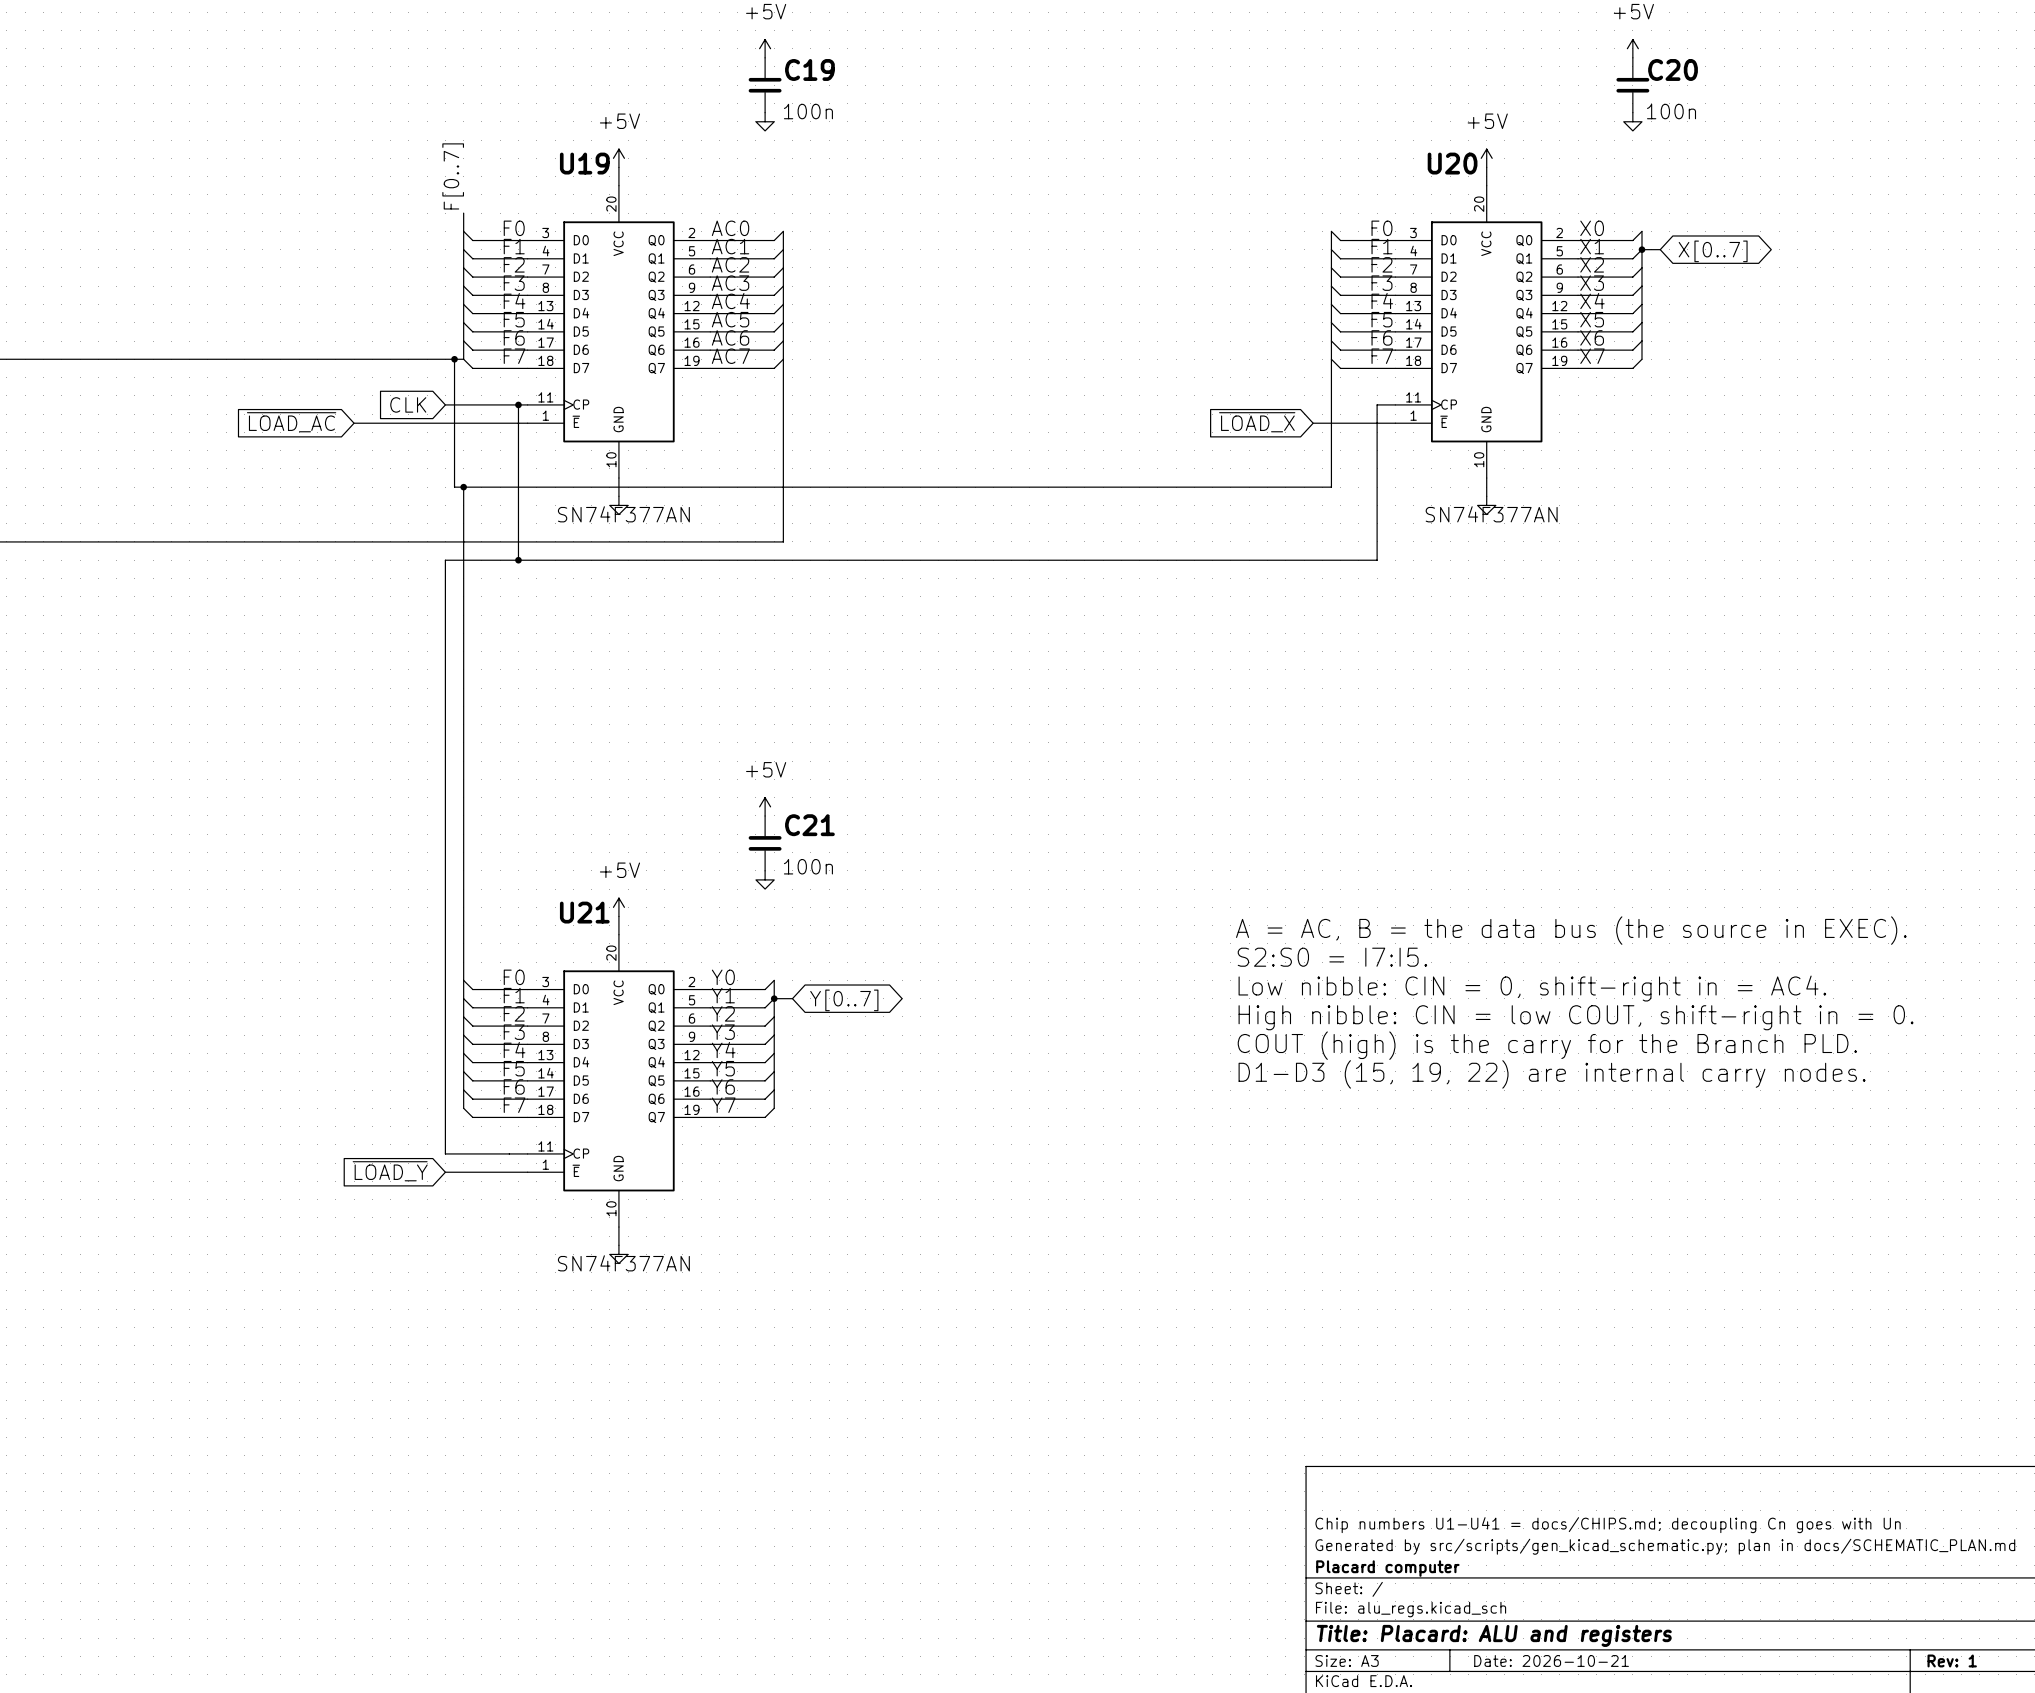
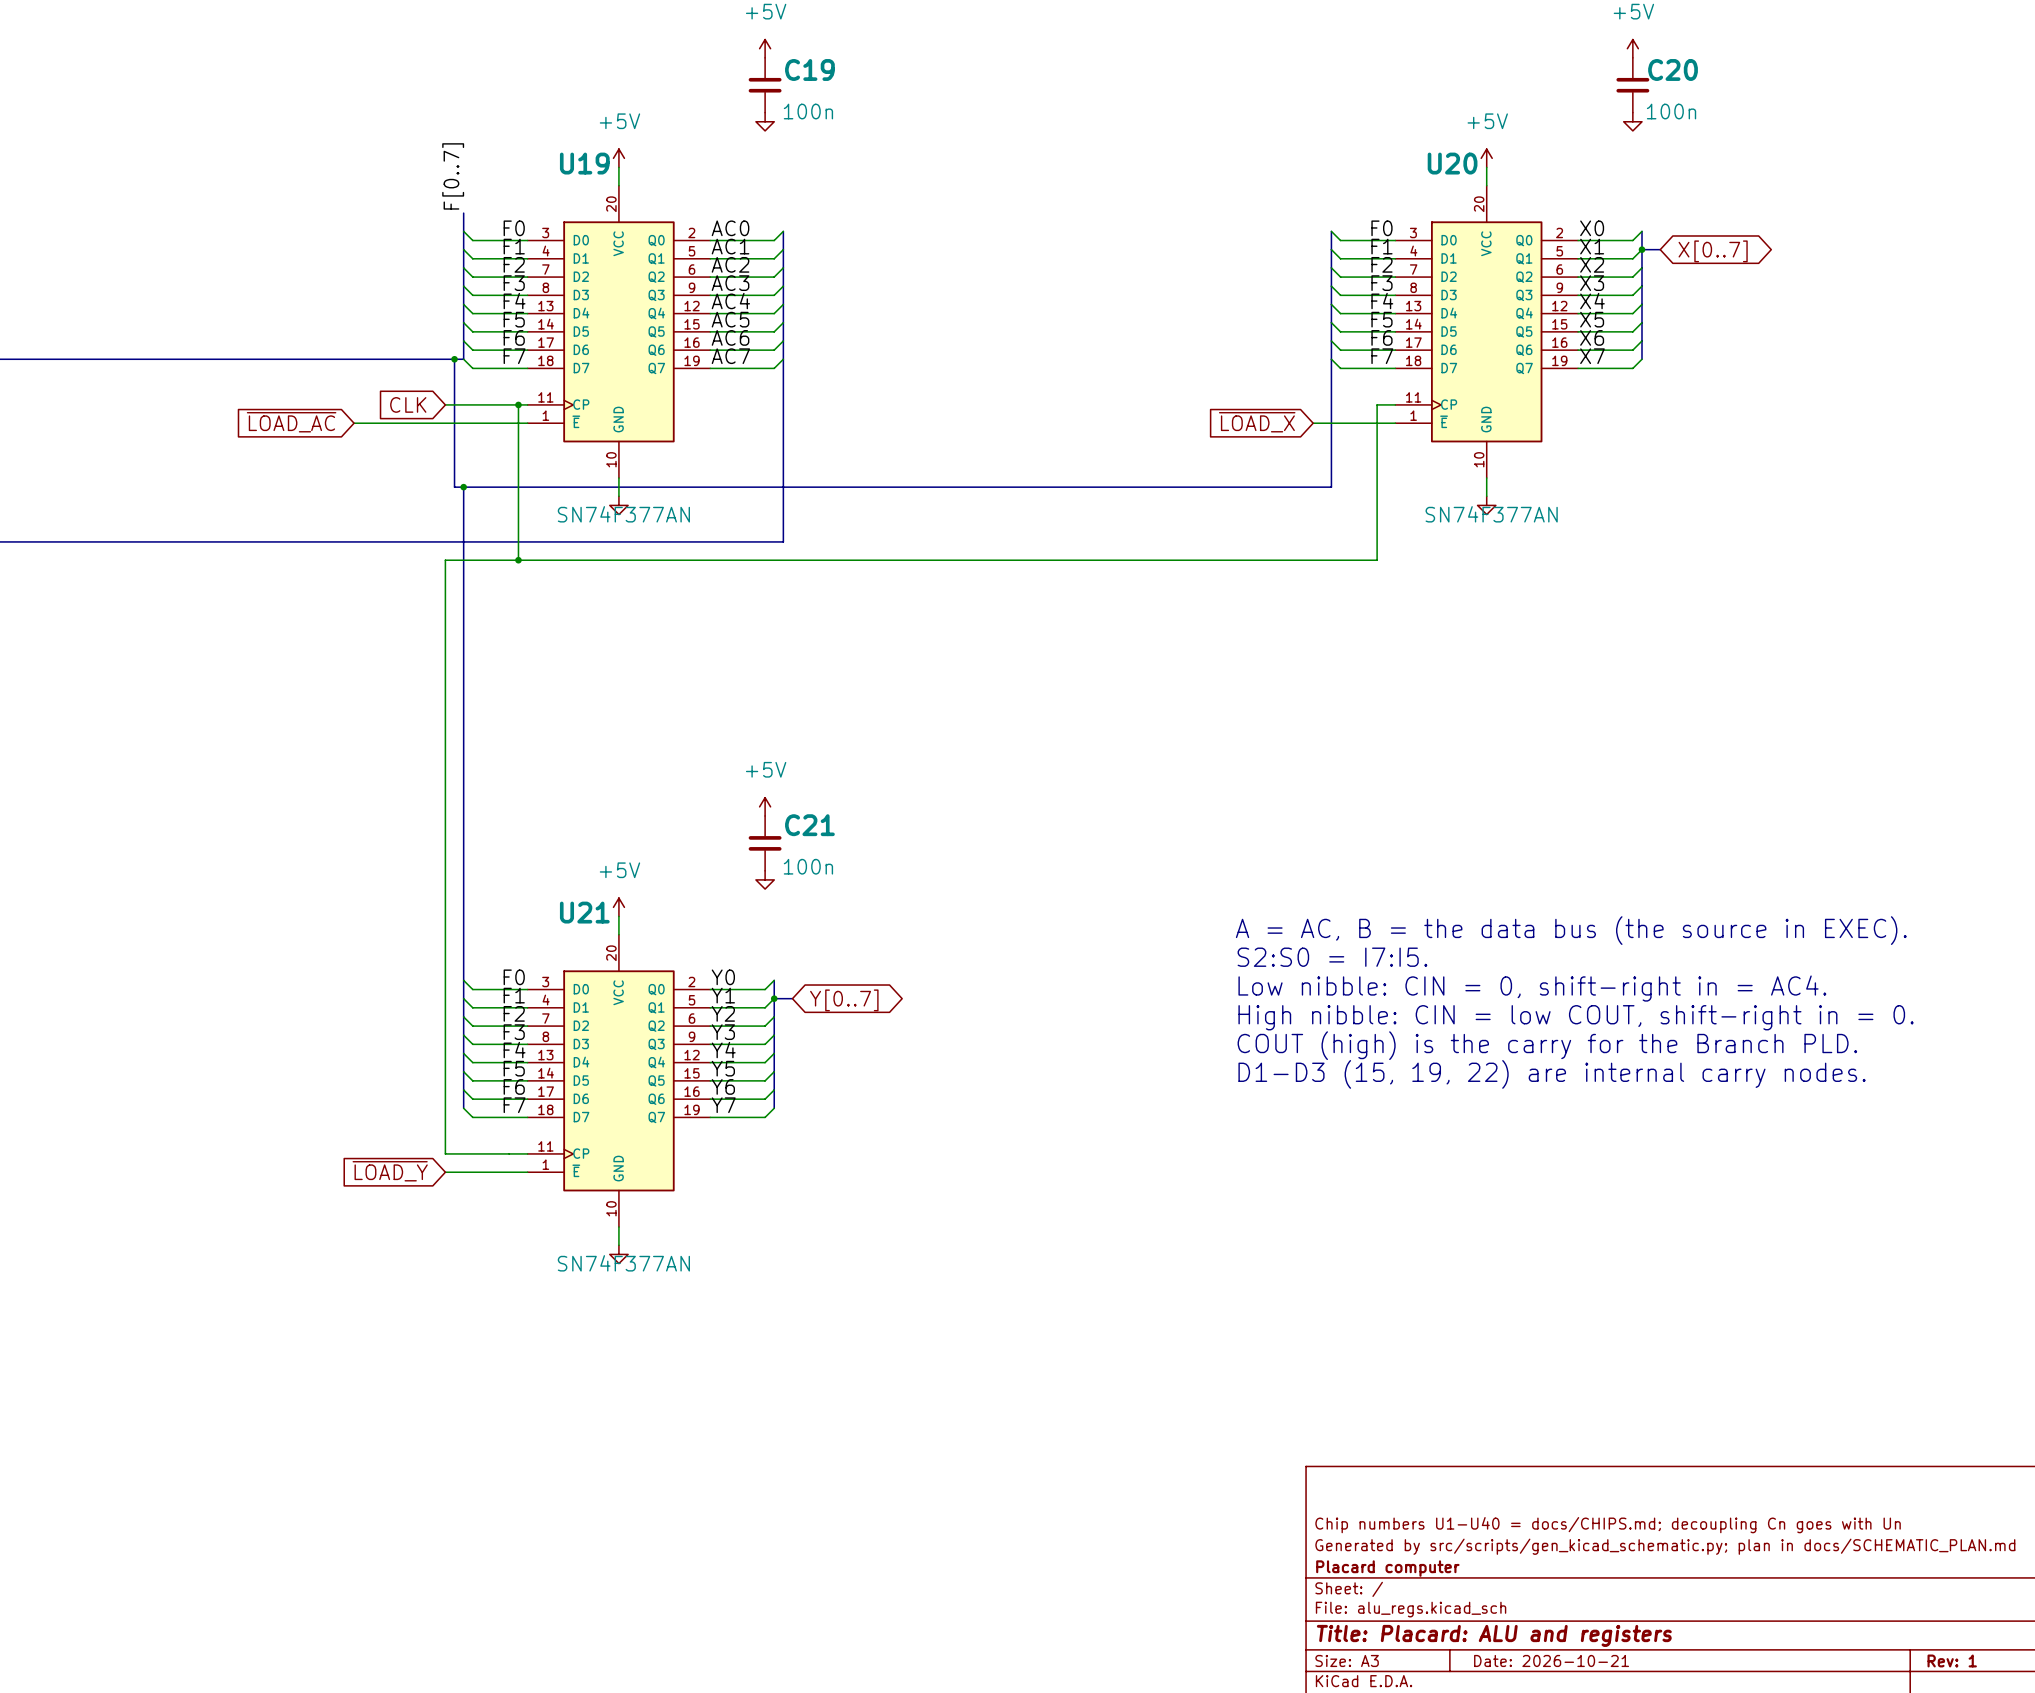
title block: Chip numbers U1-U41 = docs/CHIPS.md; decoupling Cn goes with Un (1608, 1525) -> Chip numbers U1-U40 = docs/CHIPS.md; decoupling Cn goes with Un (1608, 1525)

